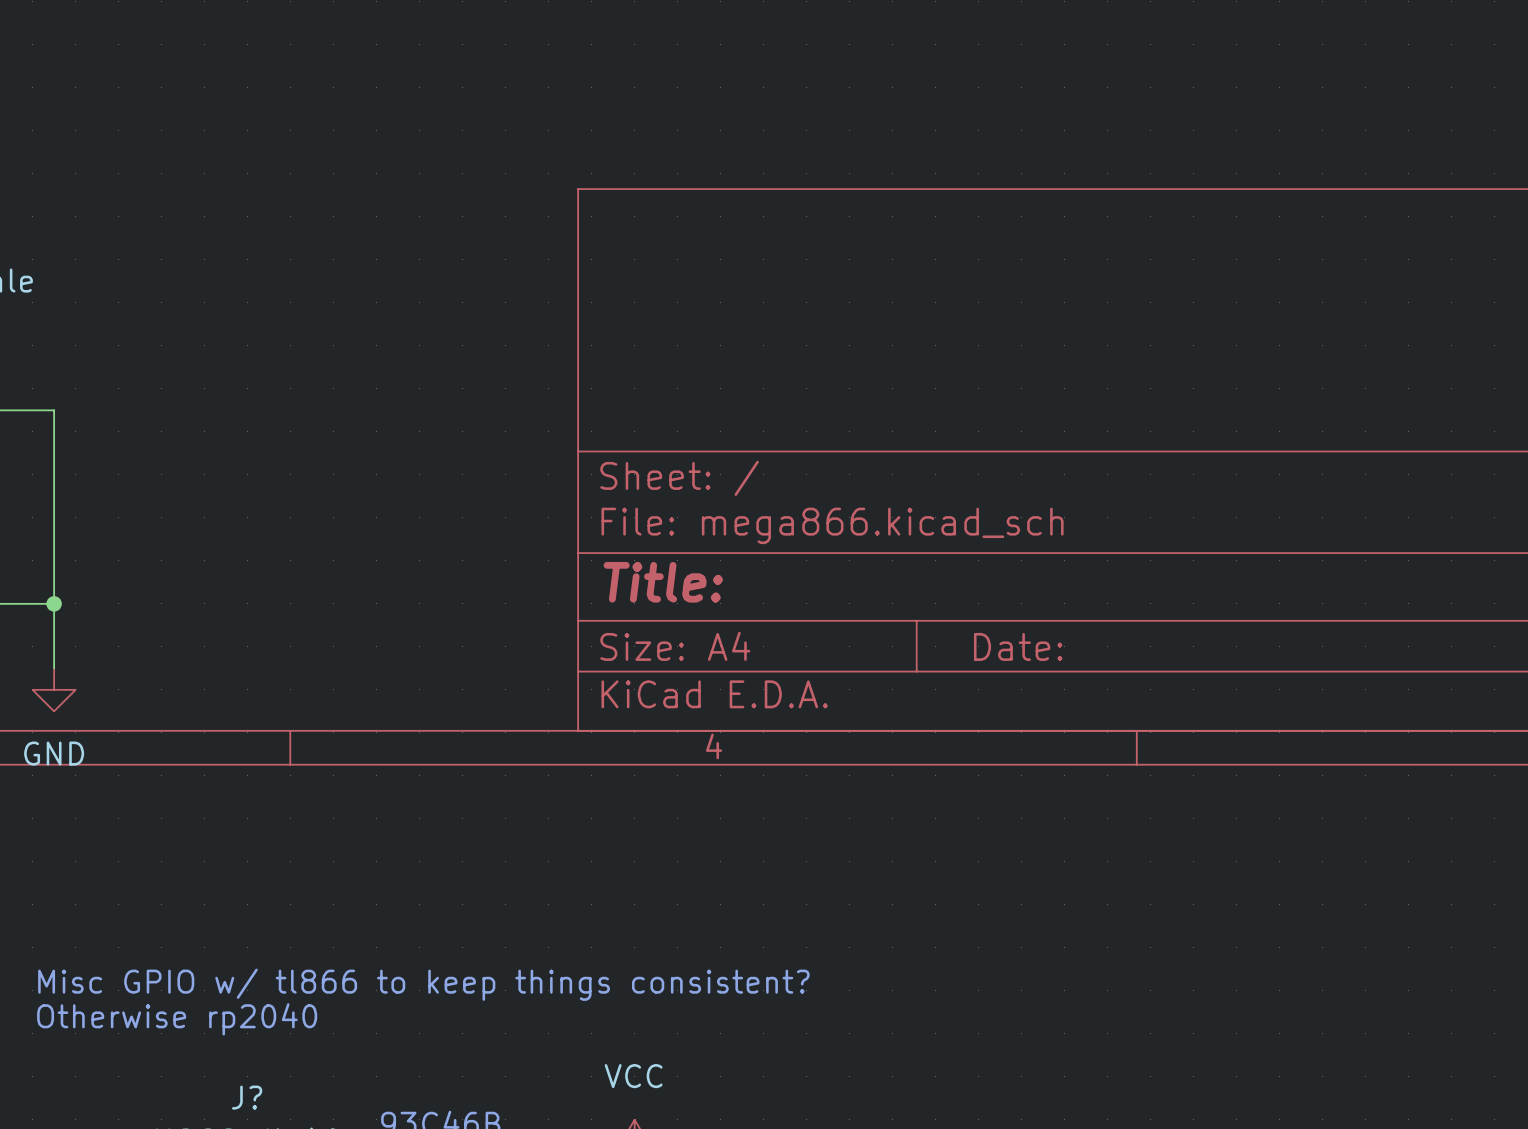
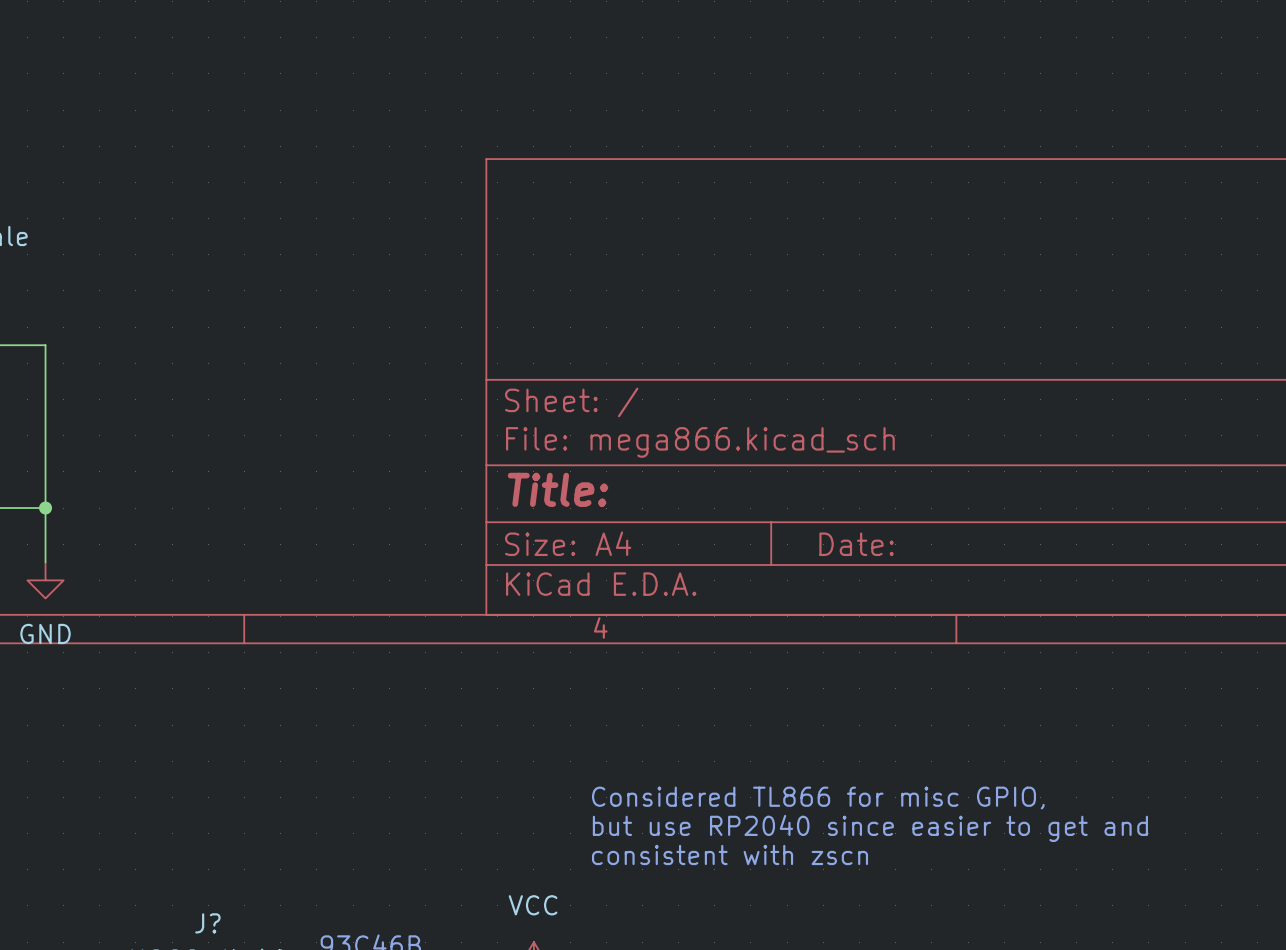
text: none -> Considered TL866 for misc GPIO, (818, 798)
text: Misc GPIO w/ tl866 to keep things consistent? (423, 984) -> none
text: none -> but use RP2040 since easier to get and (870, 828)
text: none -> consistent with zscn (730, 854)
text: Otherwise rp2040 (177, 1019) -> none

